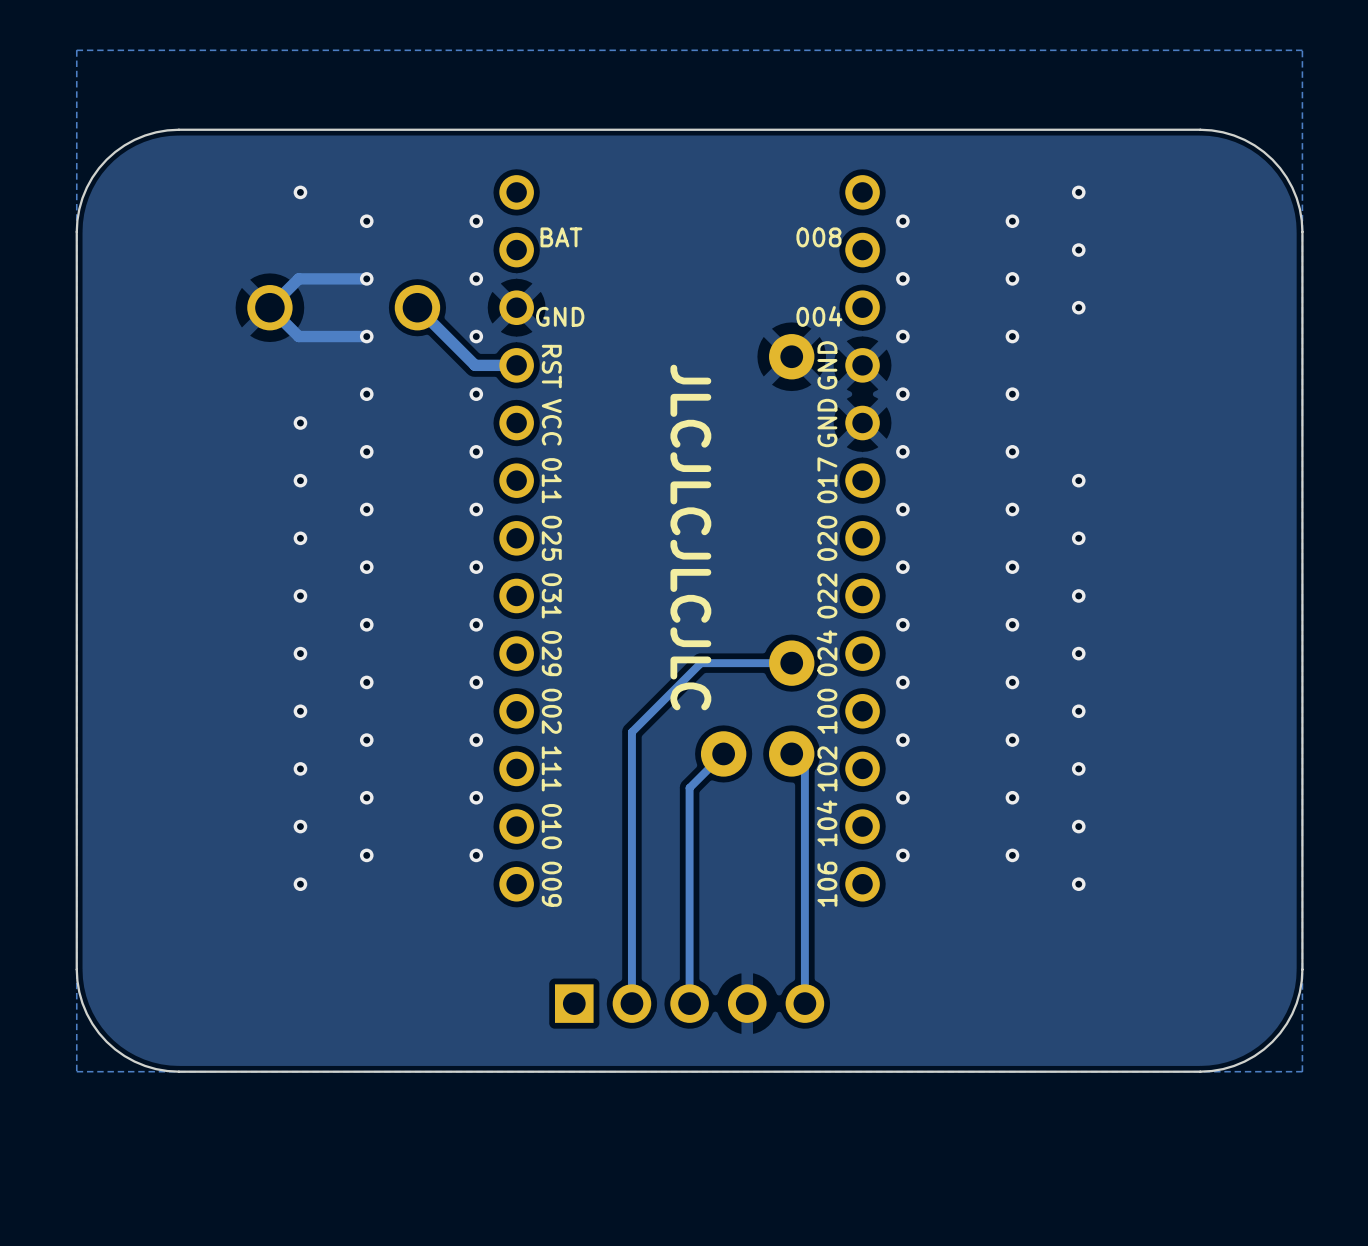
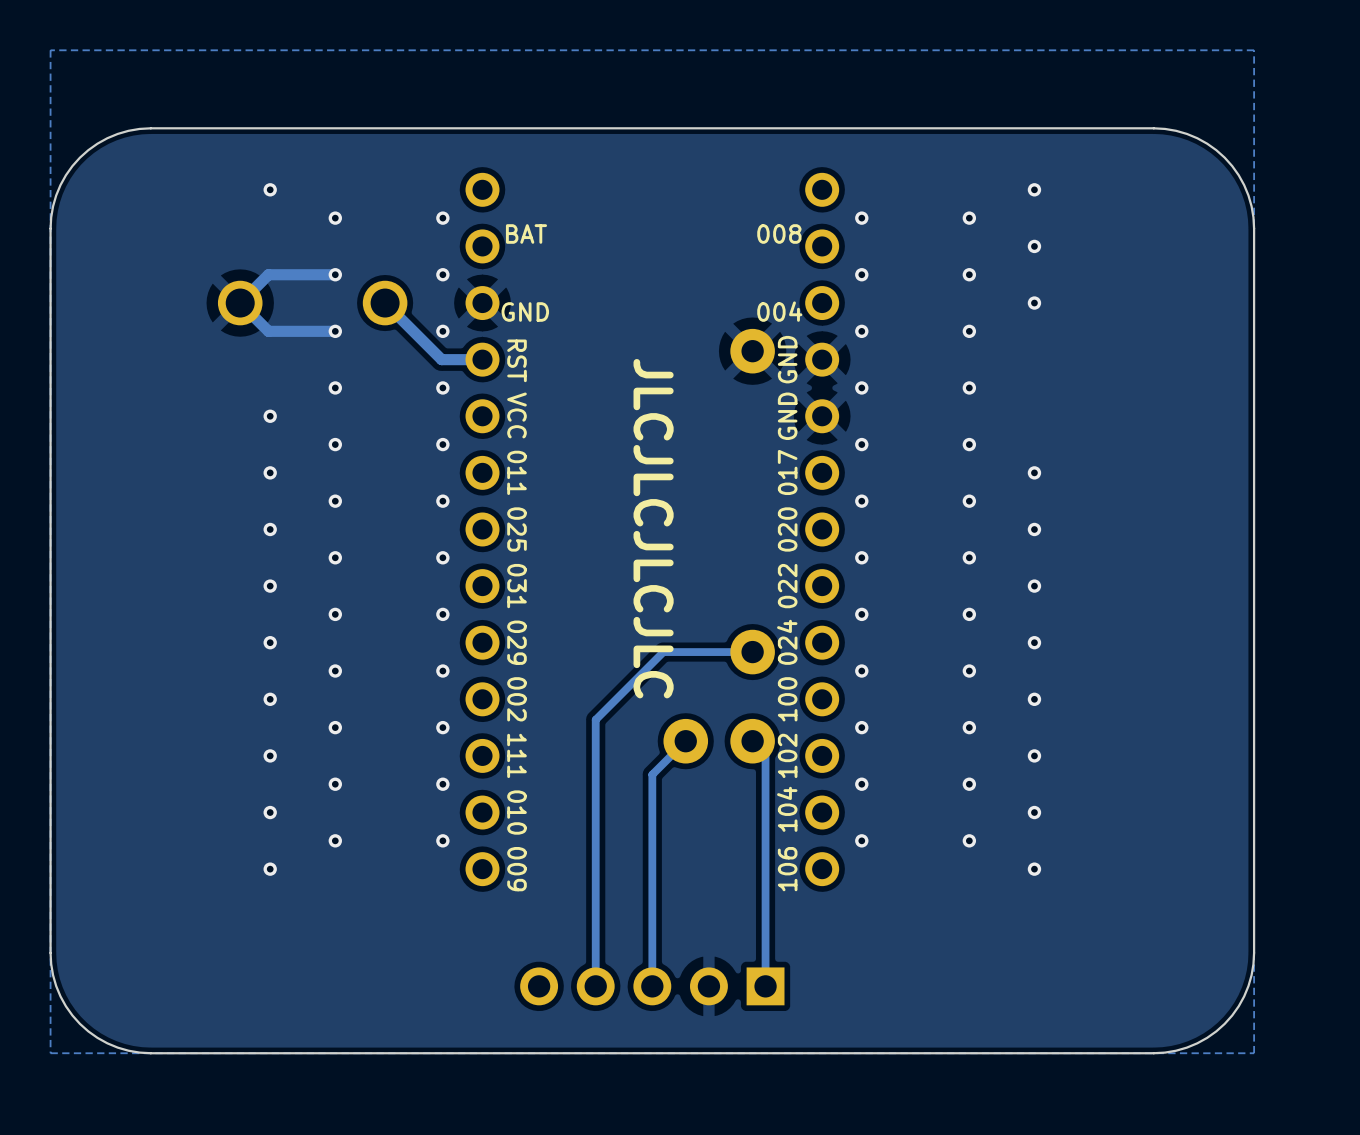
part rotation: 0° (689, 1003) -> 180° (652, 986)

